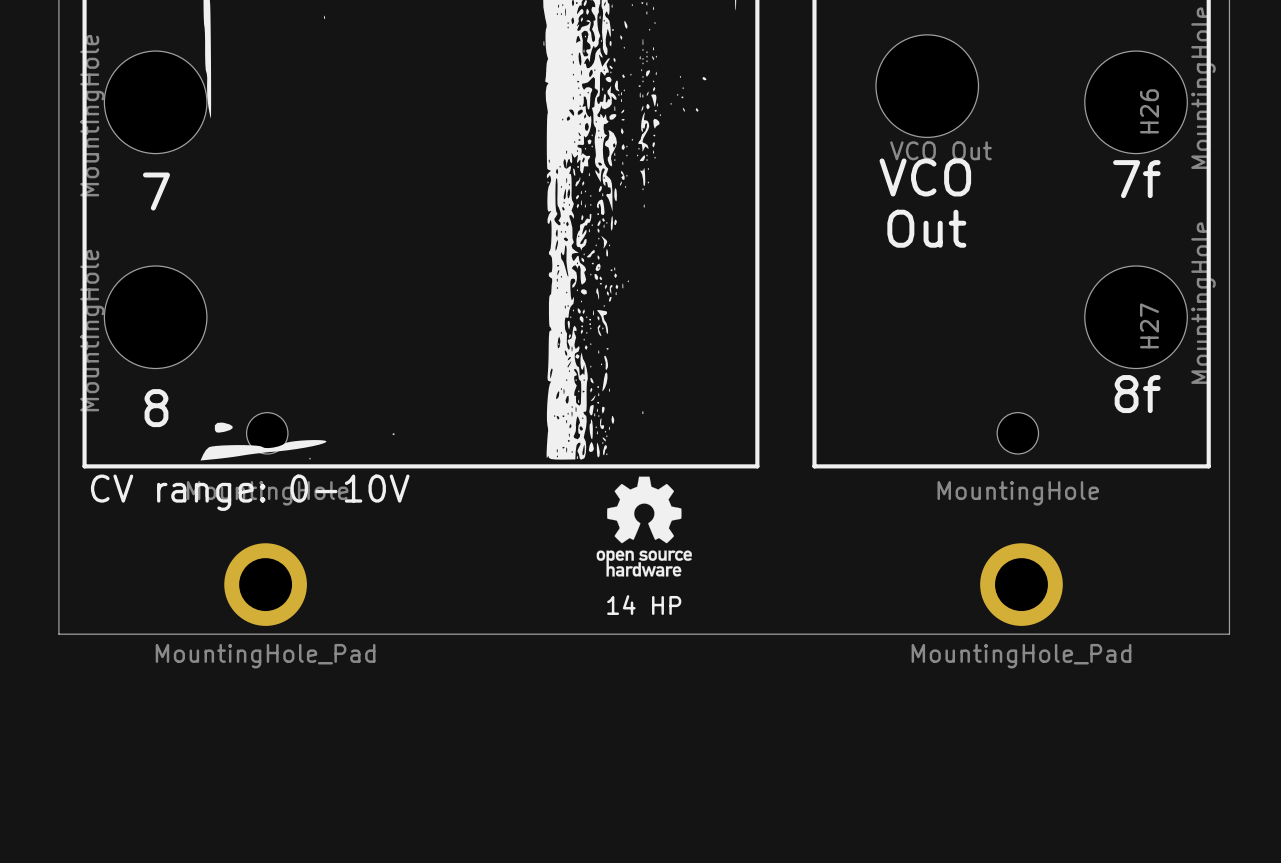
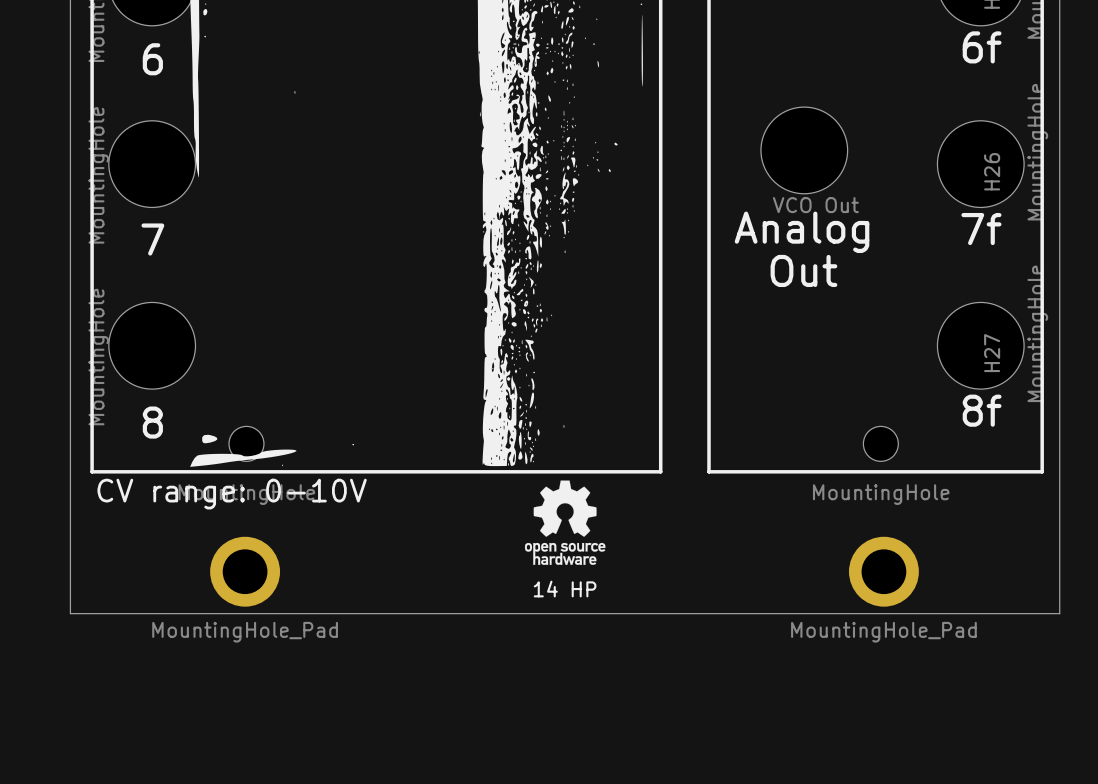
text: VCO (925, 177) -> Analog (802, 232)

